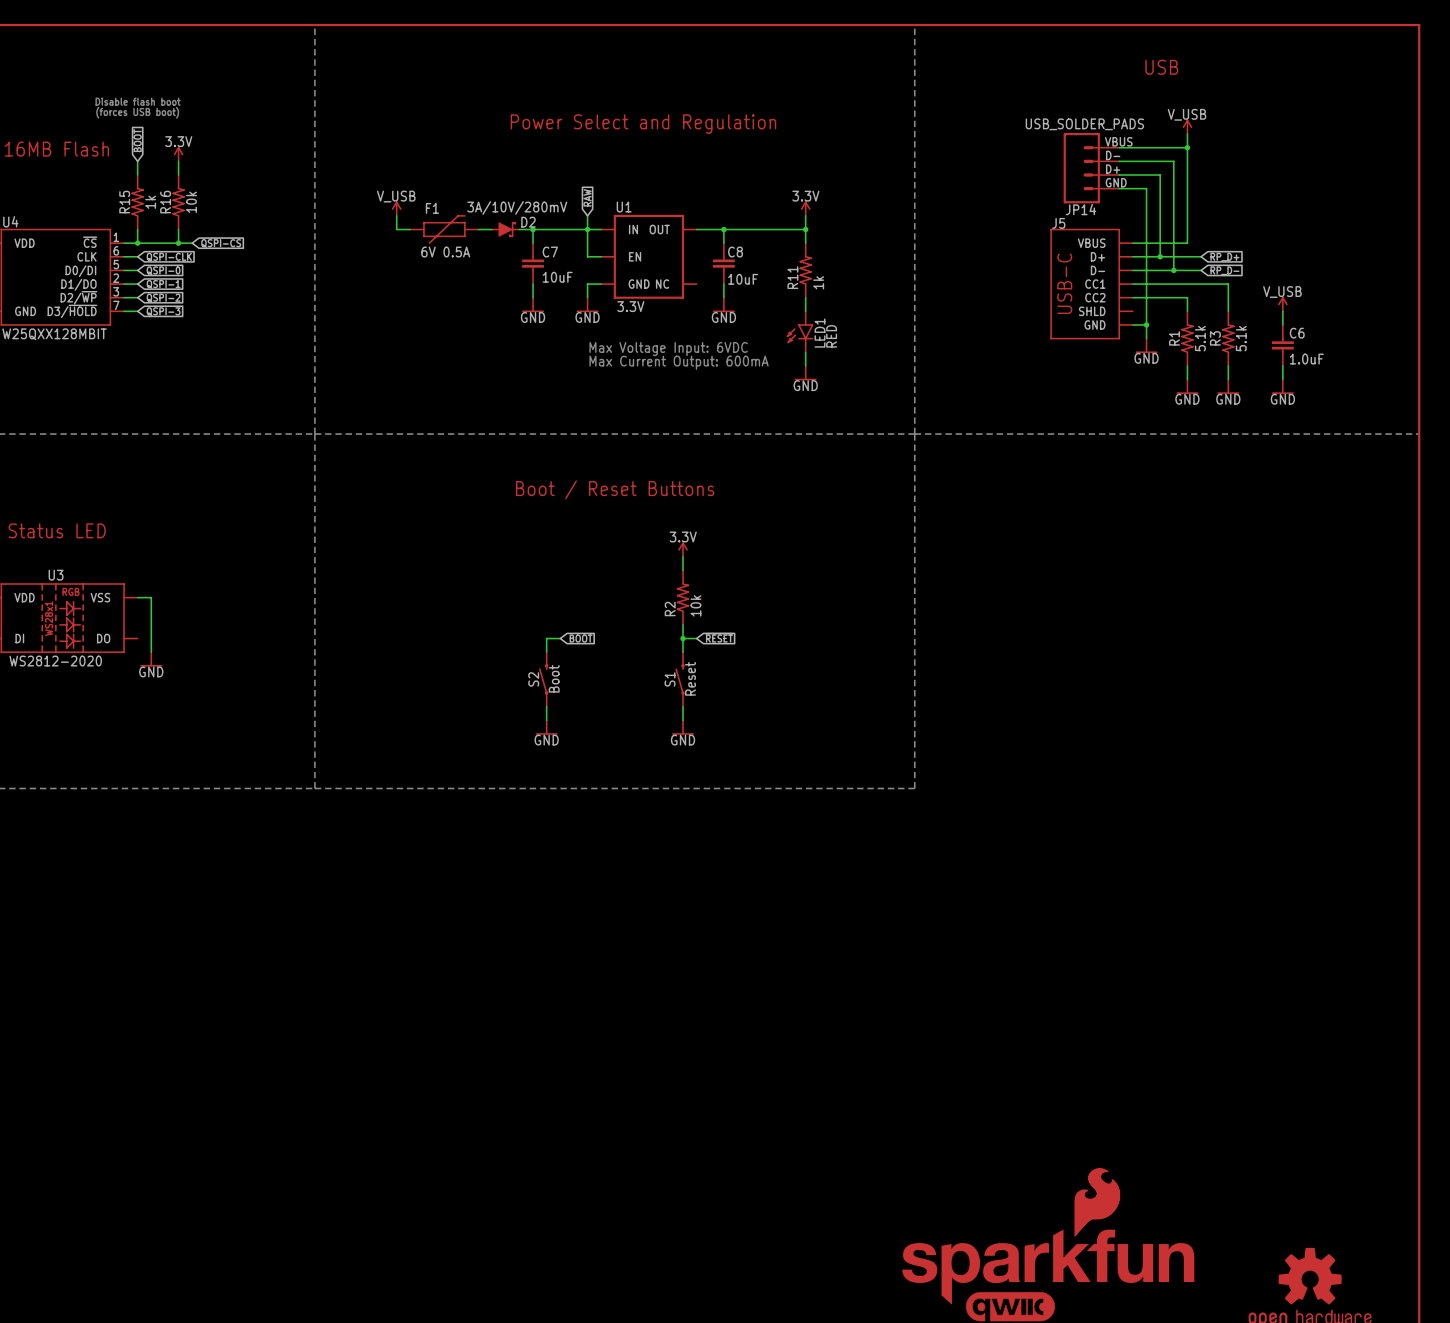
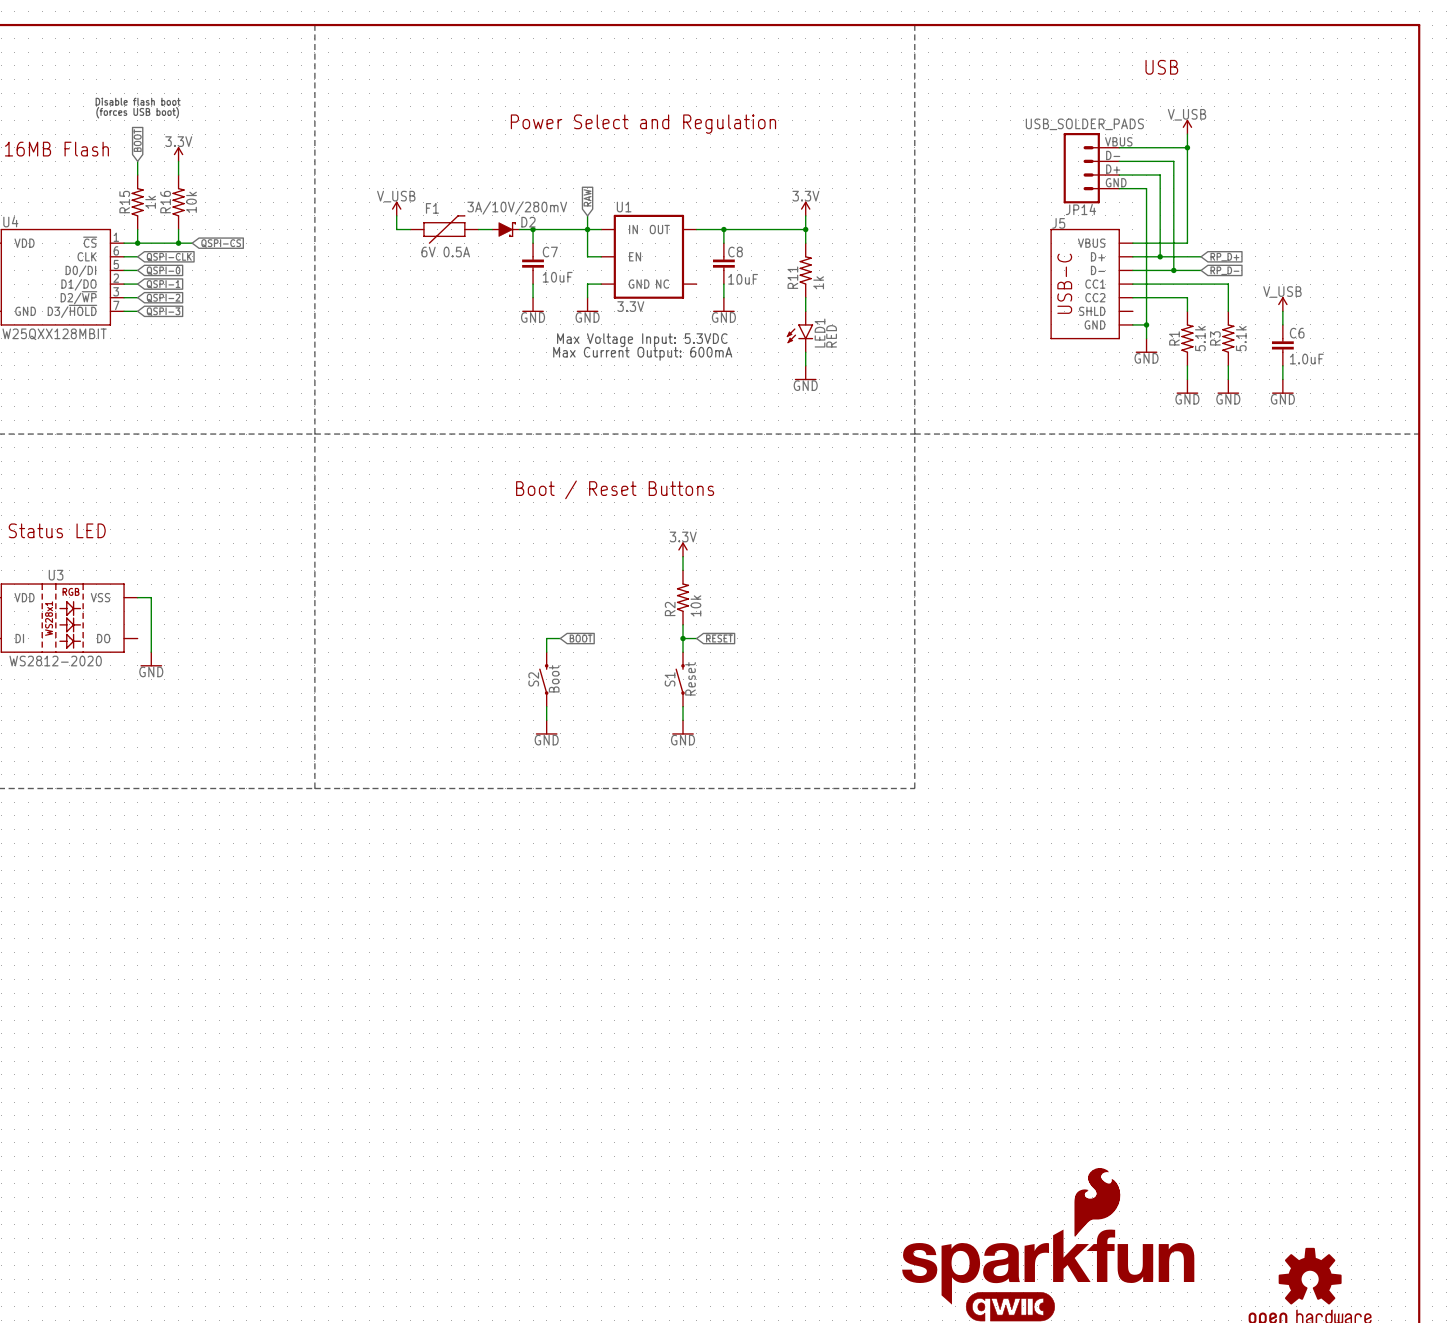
text: Max Voltage Input: 6VDC (668, 349) -> Max Voltage Input: 5.3VDC (642, 340)
text position: Max Current Output: 600mA (679, 362) -> Max Current Output: 600mA (642, 353)

